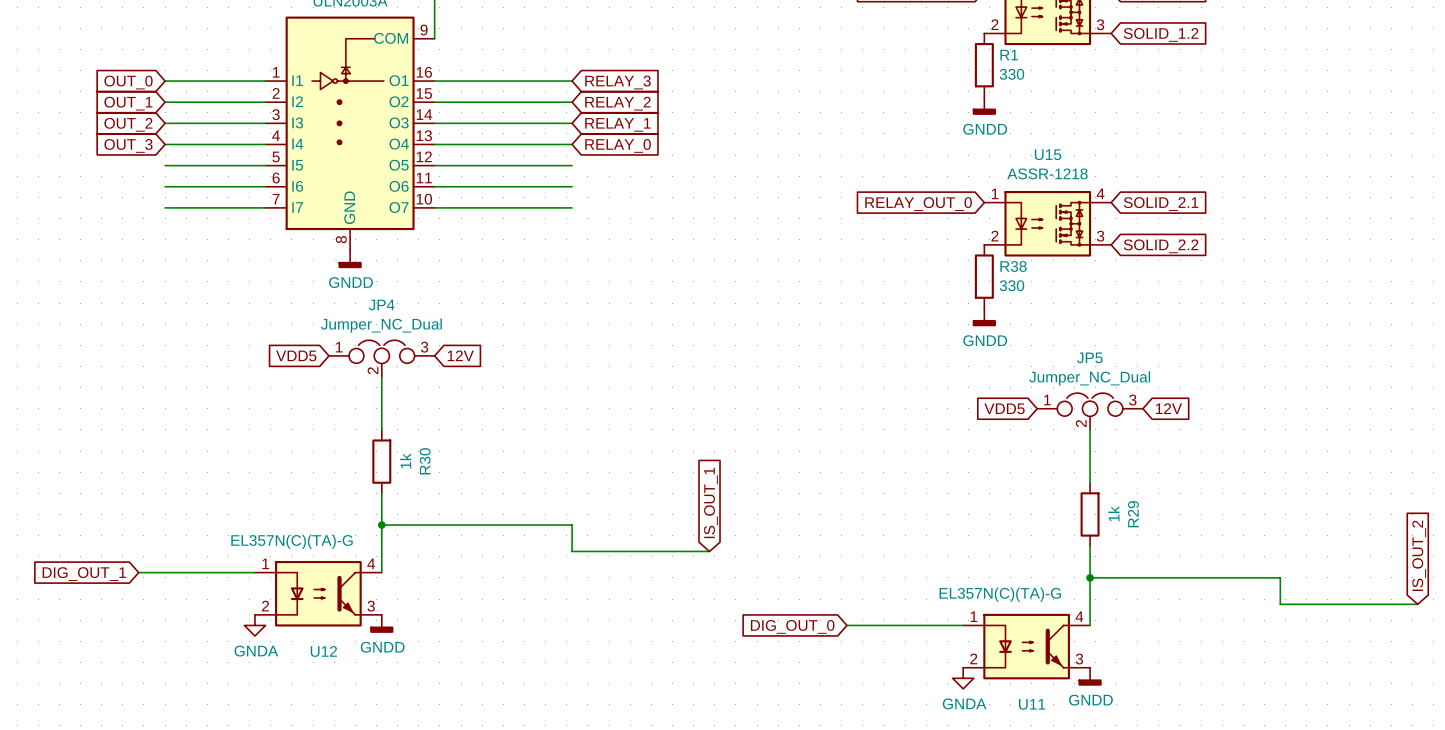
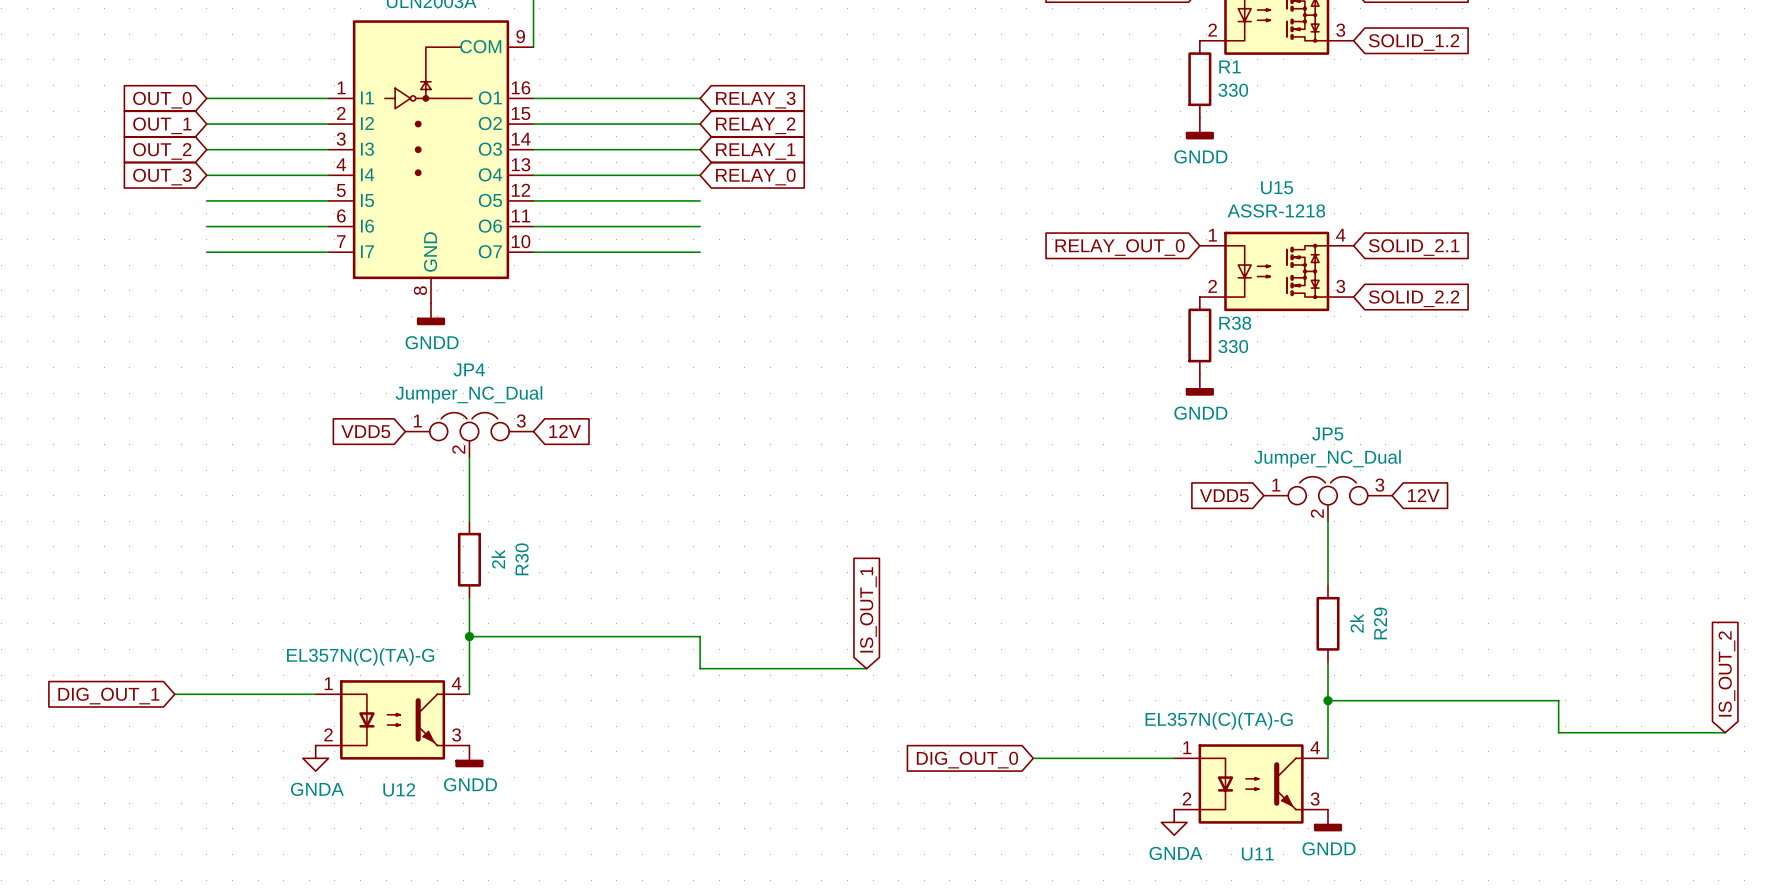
R30 value: 1k (405, 461) -> 2k (498, 559)
R29 value: 1k (1113, 513) -> 2k (1356, 623)

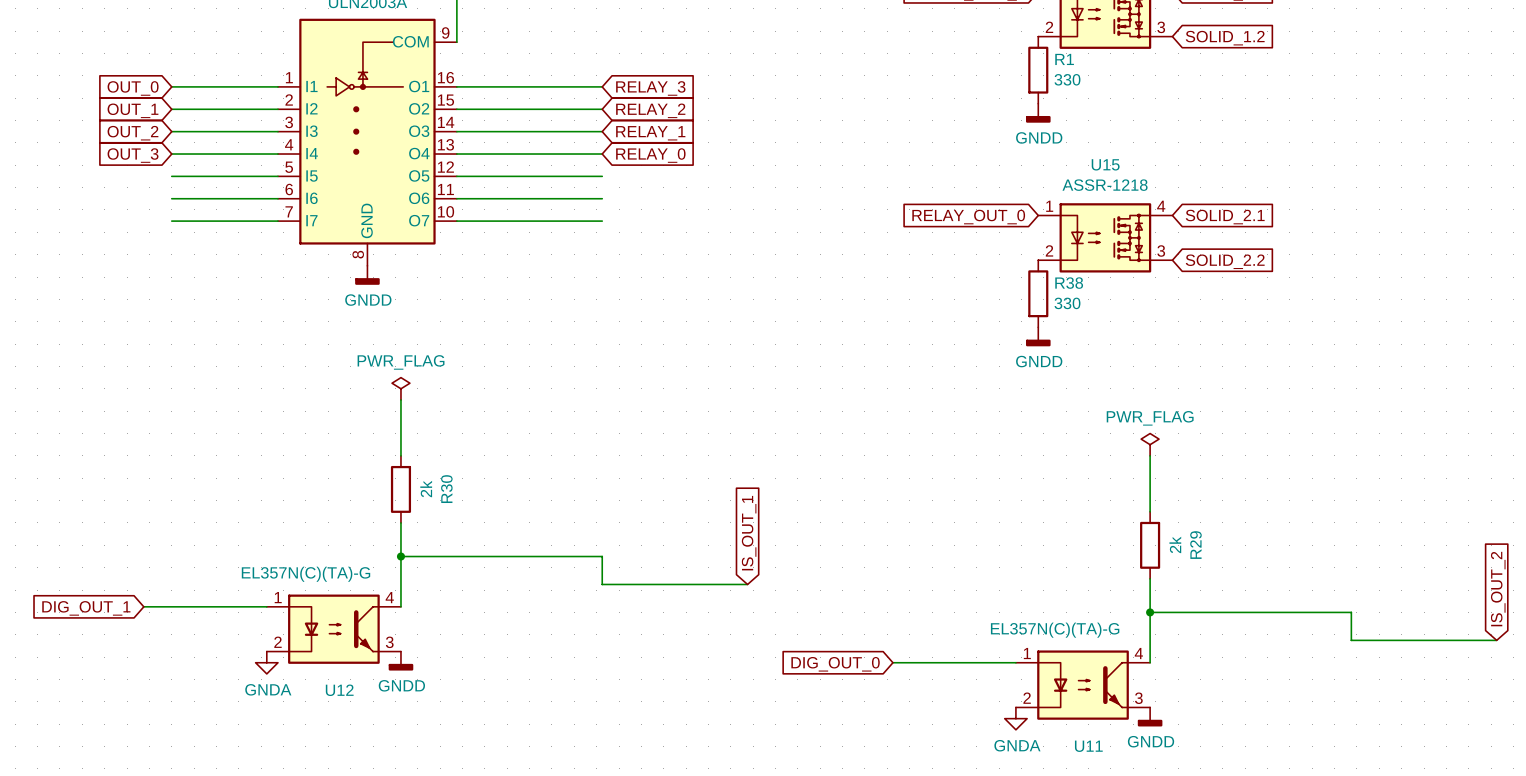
global label: VDD5 (365, 431) -> none
global label: 12V (565, 431) -> none
JP4: Jumper_NC_Dual (469, 434) -> none
power symbol: none -> PWR_FLAG (400, 388)
global label: VDD5 (1224, 495) -> none
global label: 12V (1423, 495) -> none
JP5: Jumper_NC_Dual (1327, 498) -> none
power symbol: none -> PWR_FLAG (1150, 444)

